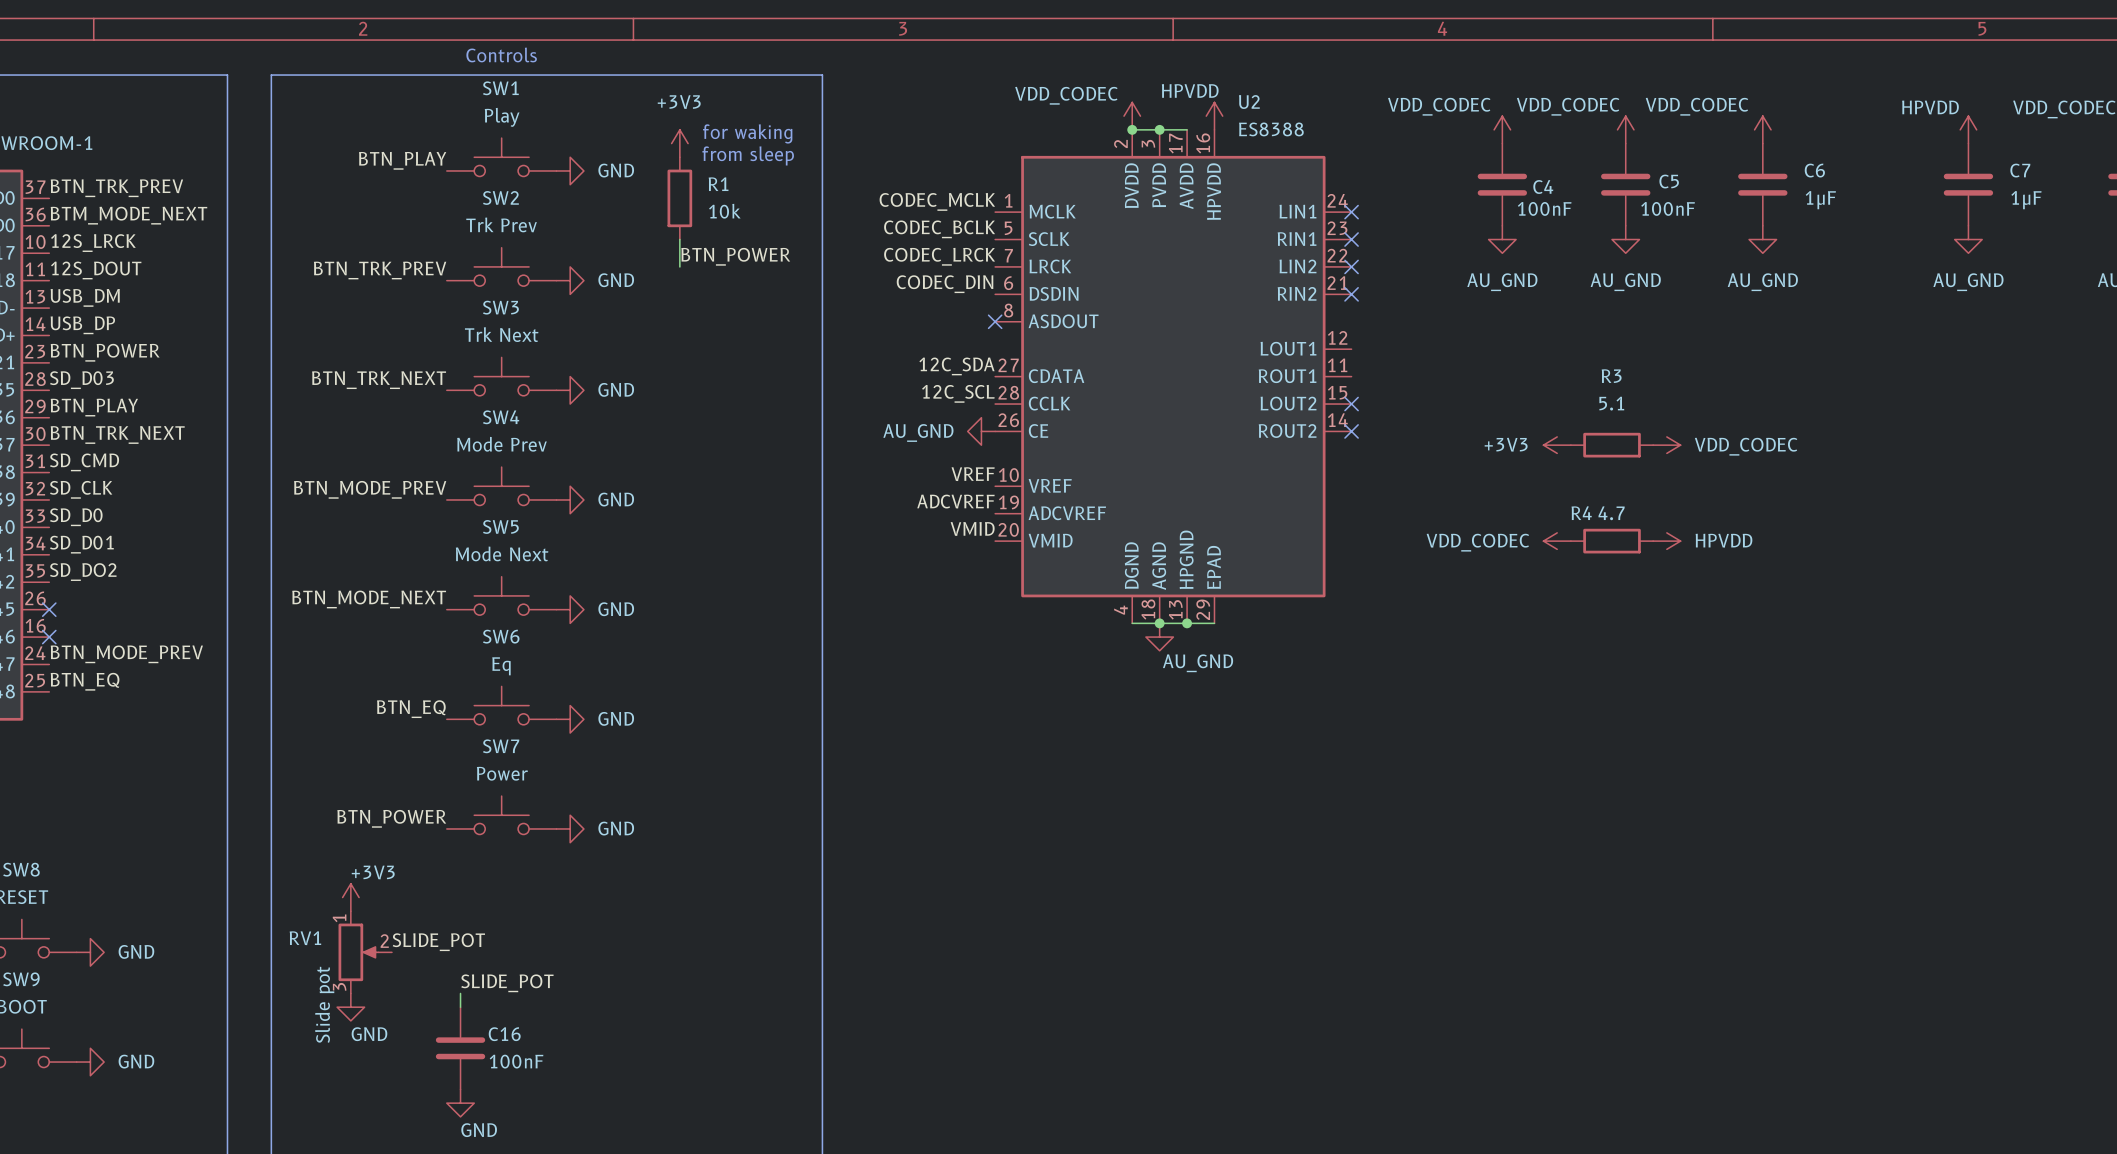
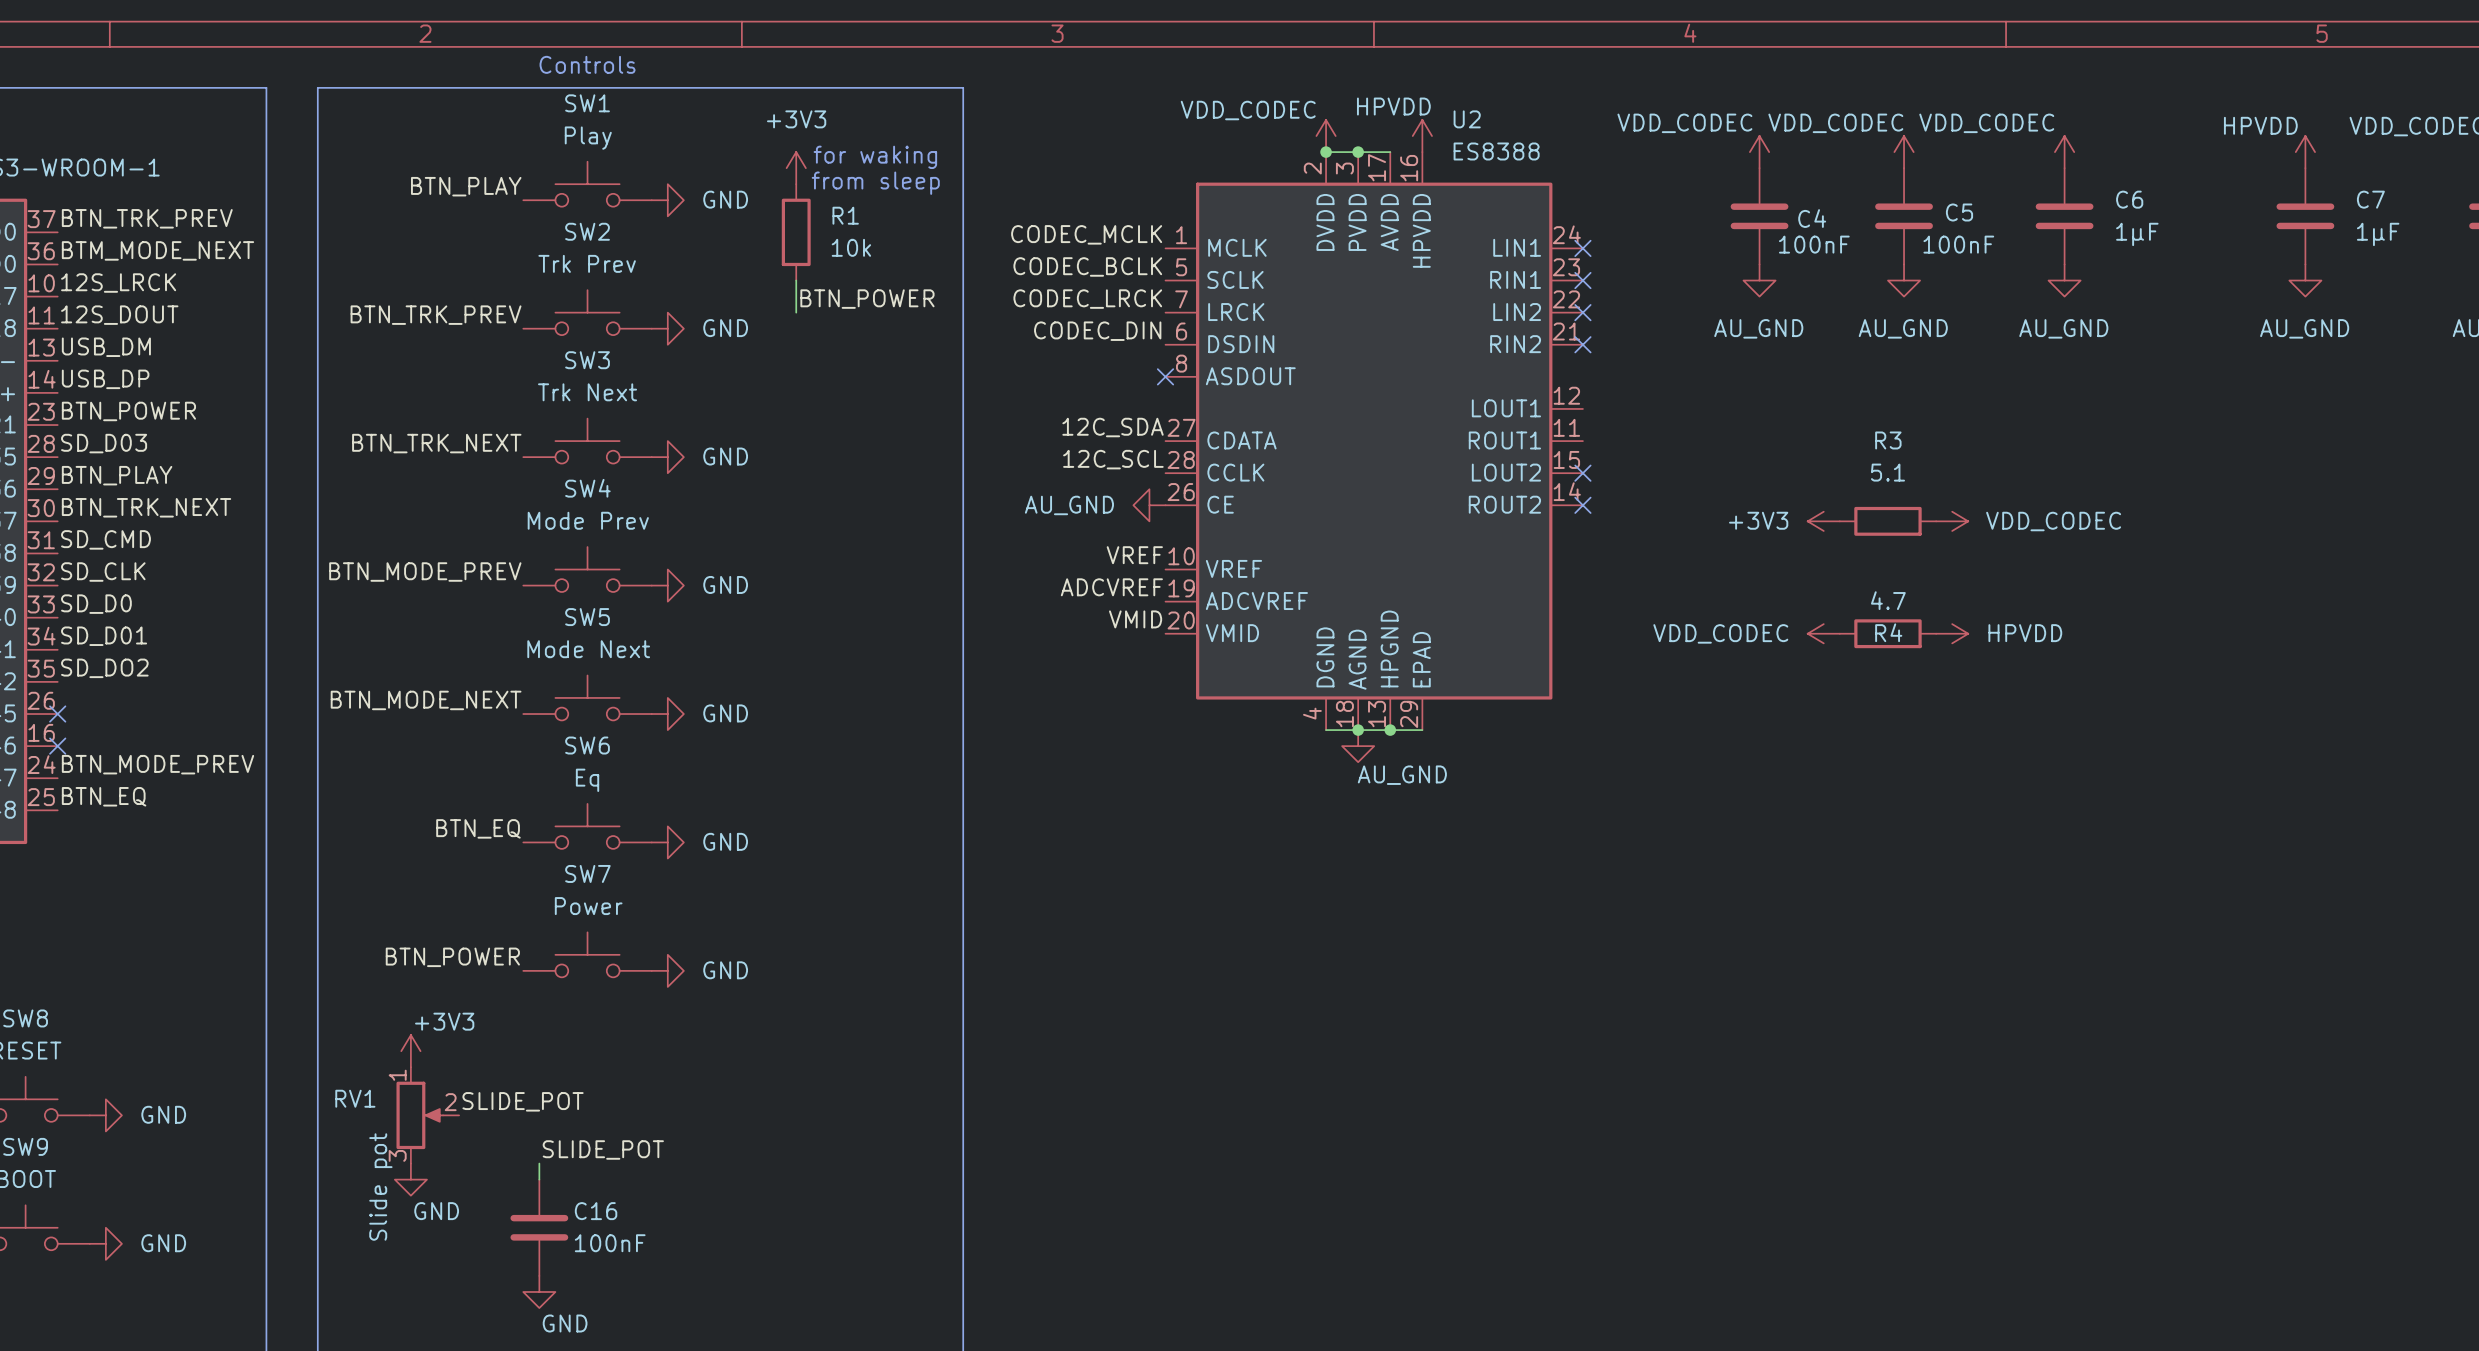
R4 name position: R4 (1581, 513) -> R4 (1888, 632)

